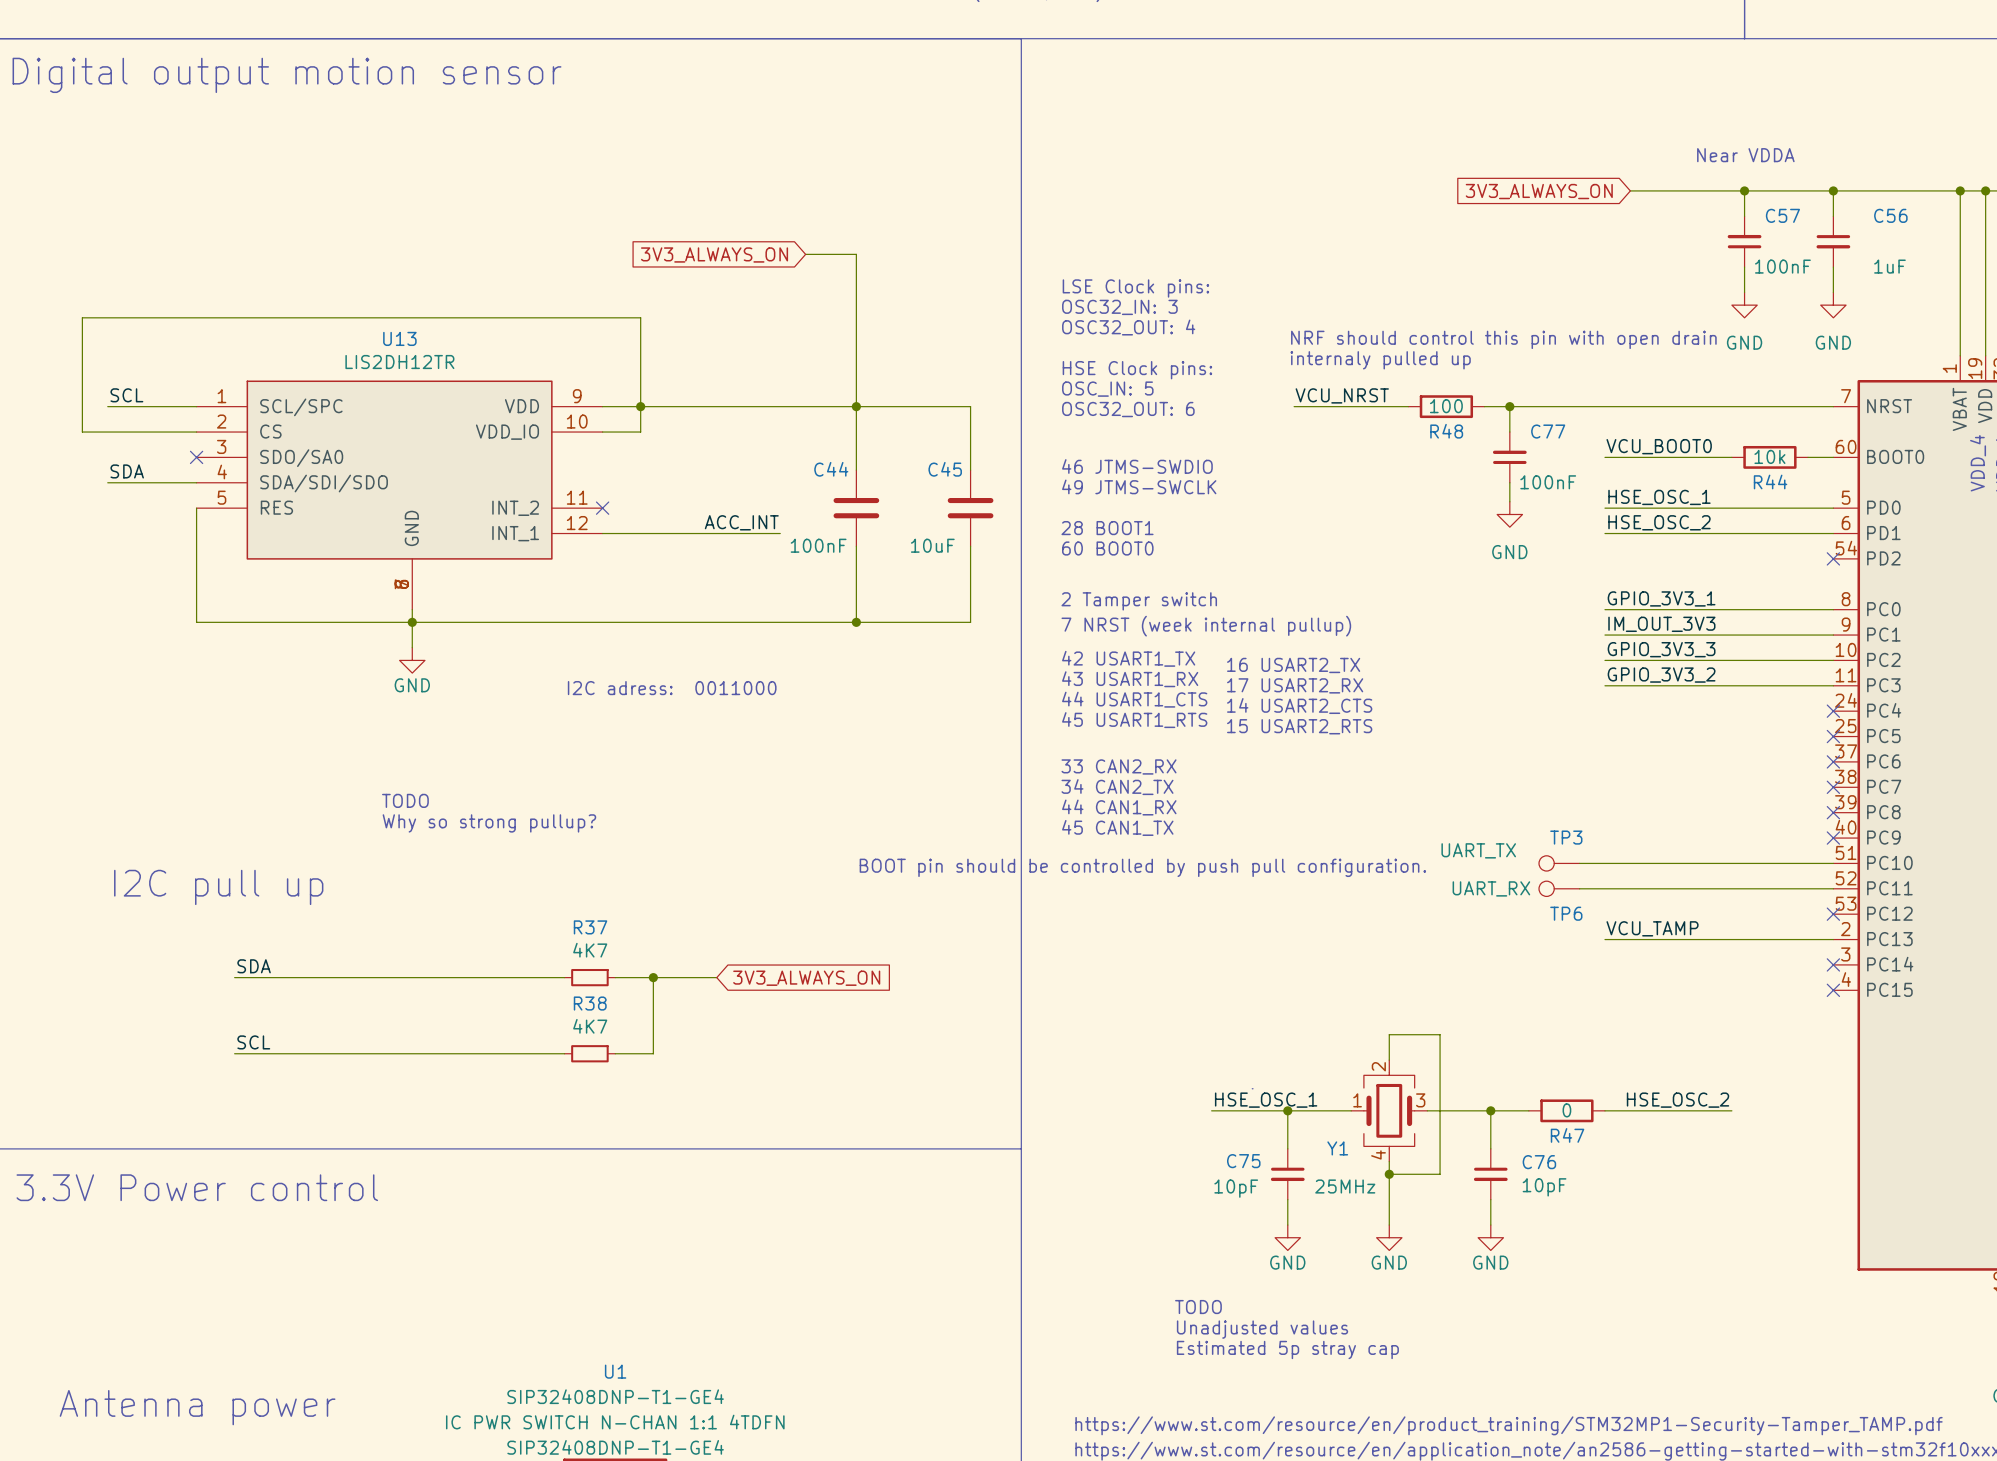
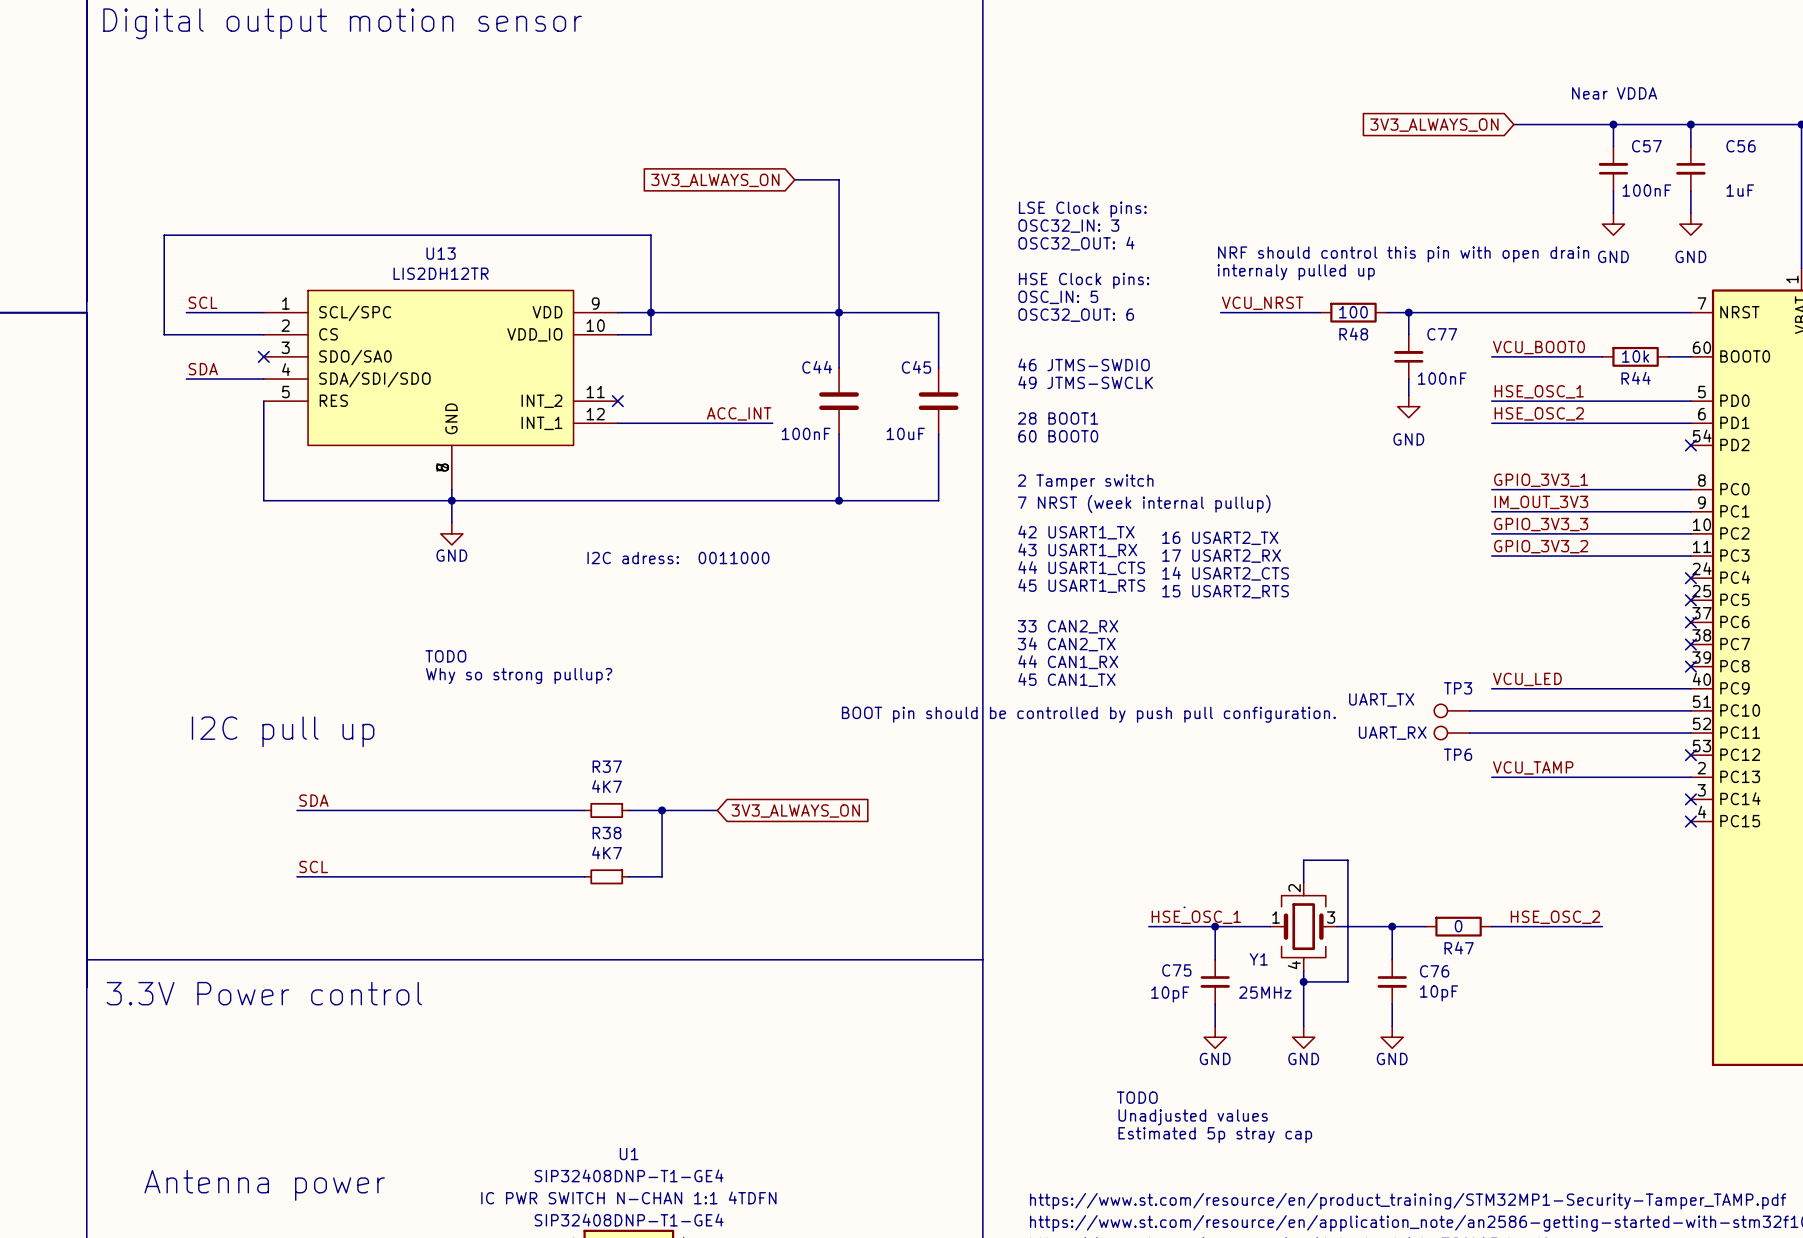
label: none -> VCU_LED (1527, 679)
wire: none -> (1491, 688) (1690, 688)
no-connect mark: (1833, 838) -> none

